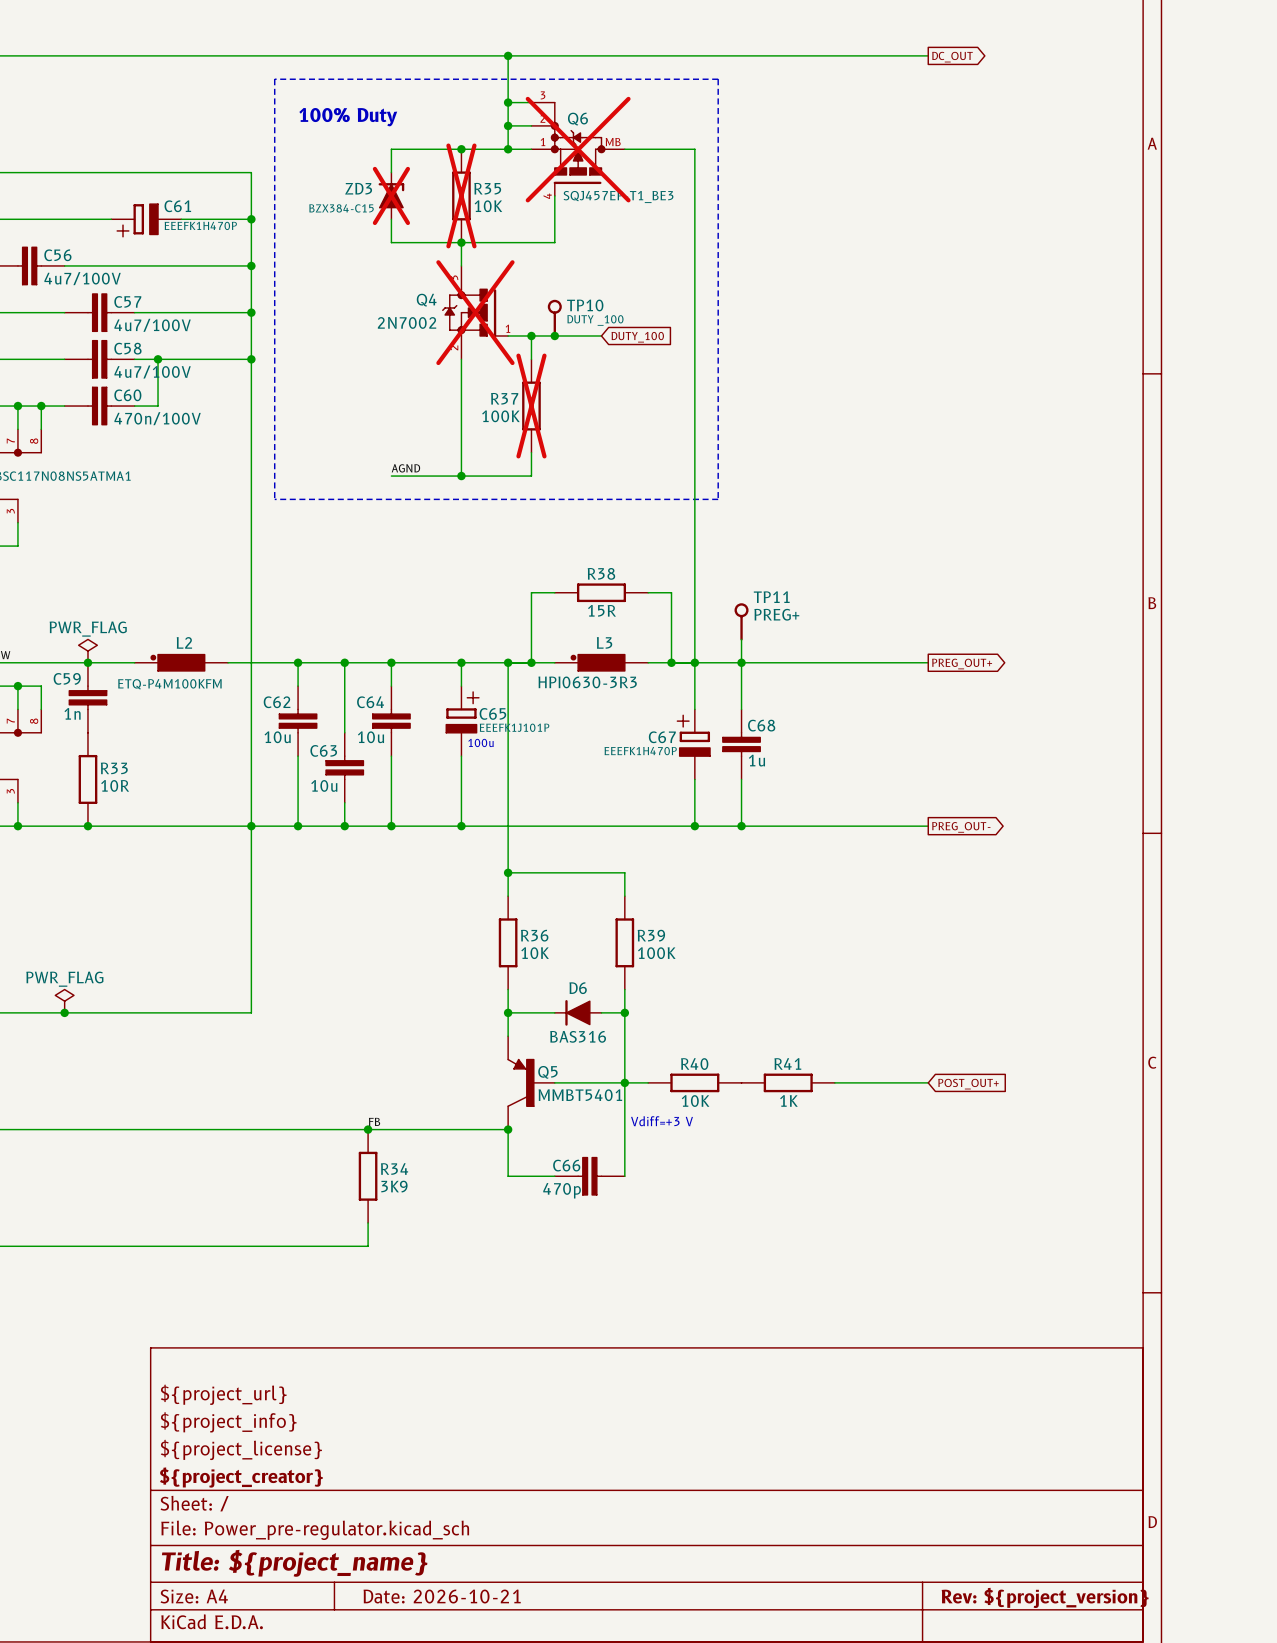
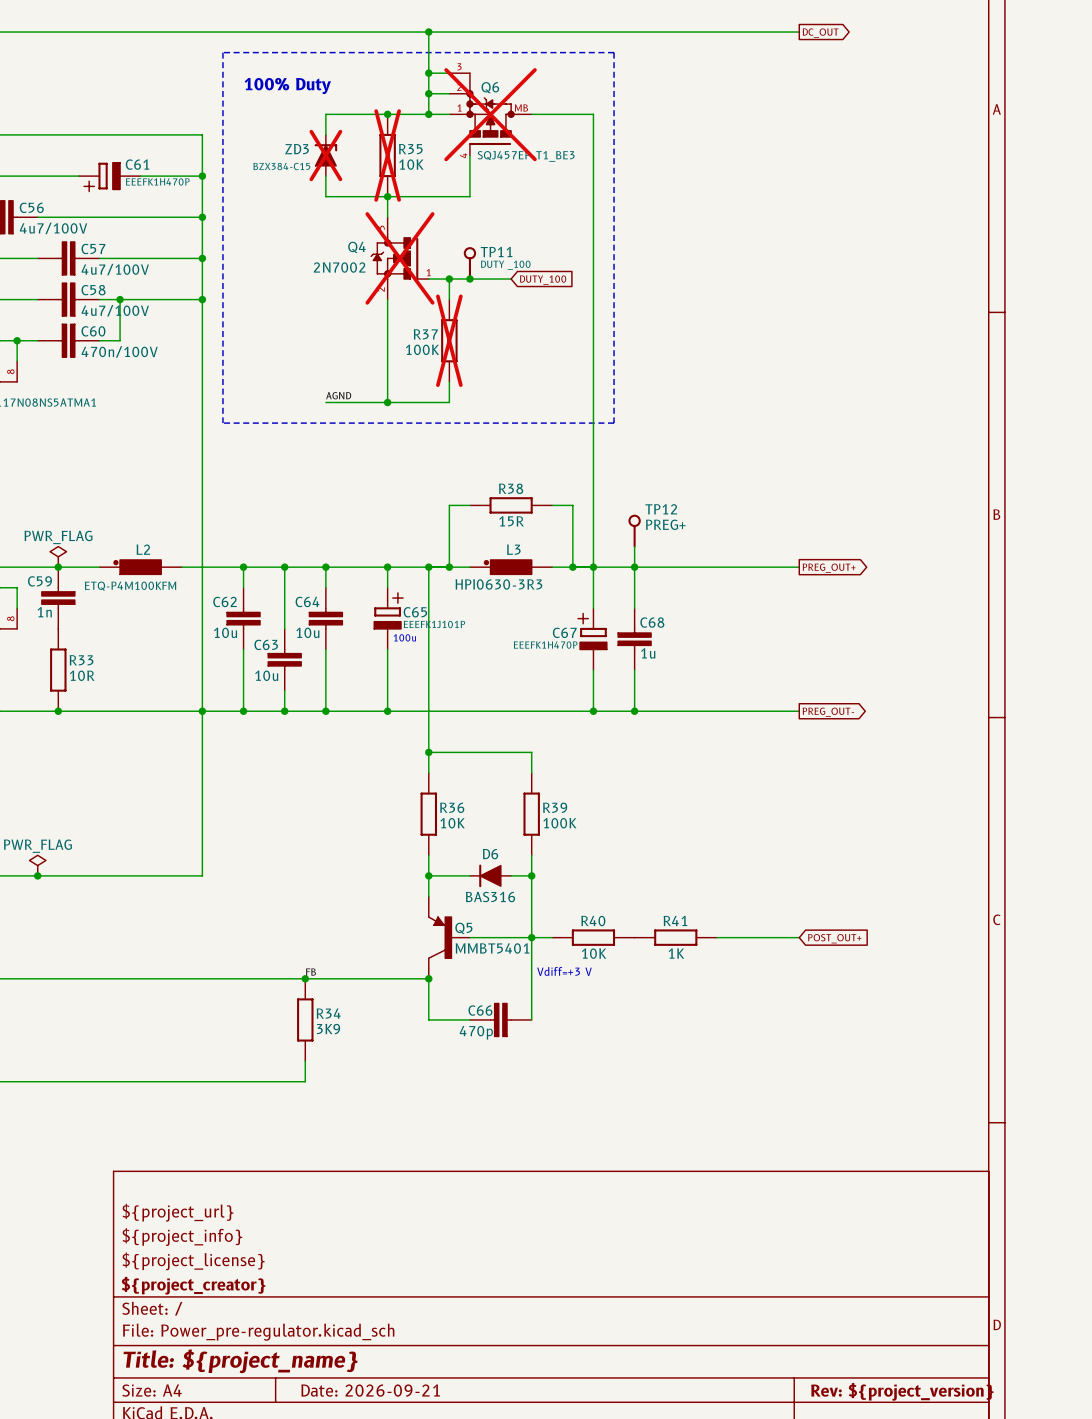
TP10 name: TP10 (585, 305) -> TP11 (496, 252)
TP11 name: TP11 (771, 597) -> TP12 (661, 509)
title block: Date: 2026-10-21 (442, 1596) -> Date: 2026-09-21 (370, 1390)

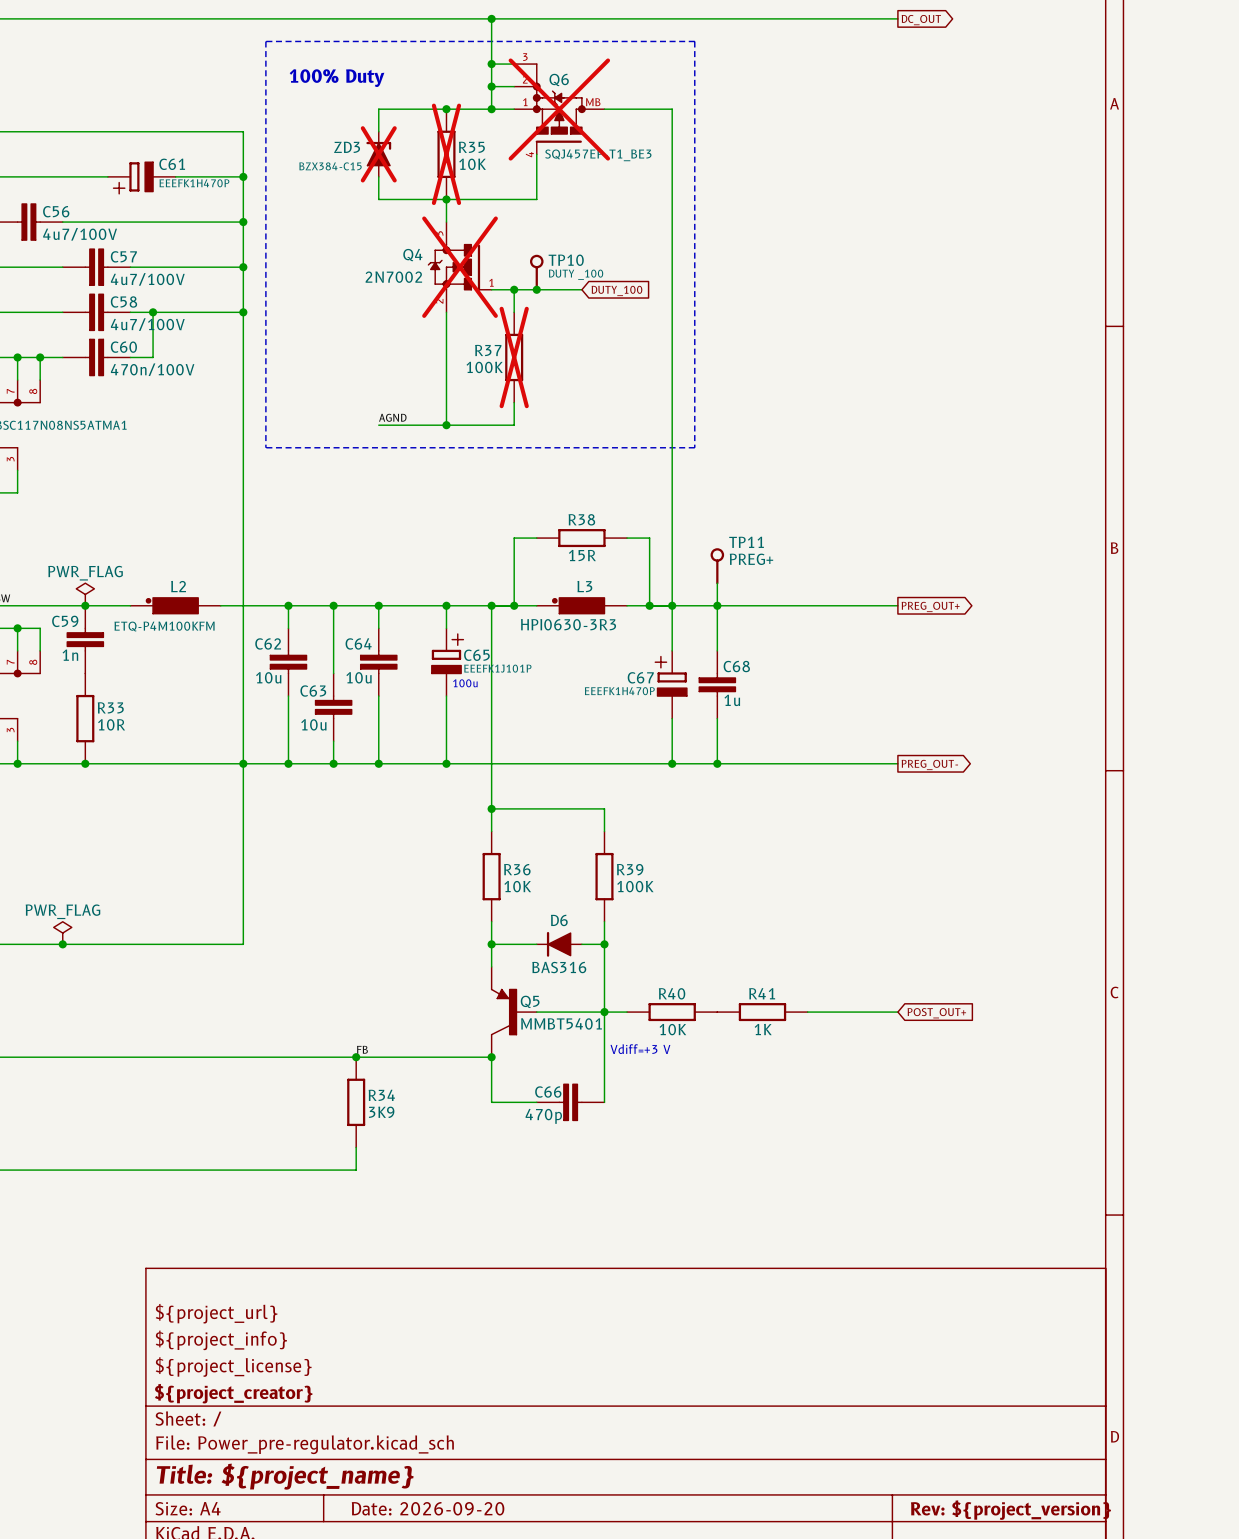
TP11 name: TP11 (496, 252) -> TP10 (566, 260)
TP12 name: TP12 (661, 509) -> TP11 (746, 542)
title block: Date: 2026-09-21 (370, 1390) -> Date: 2026-09-20 (428, 1508)

